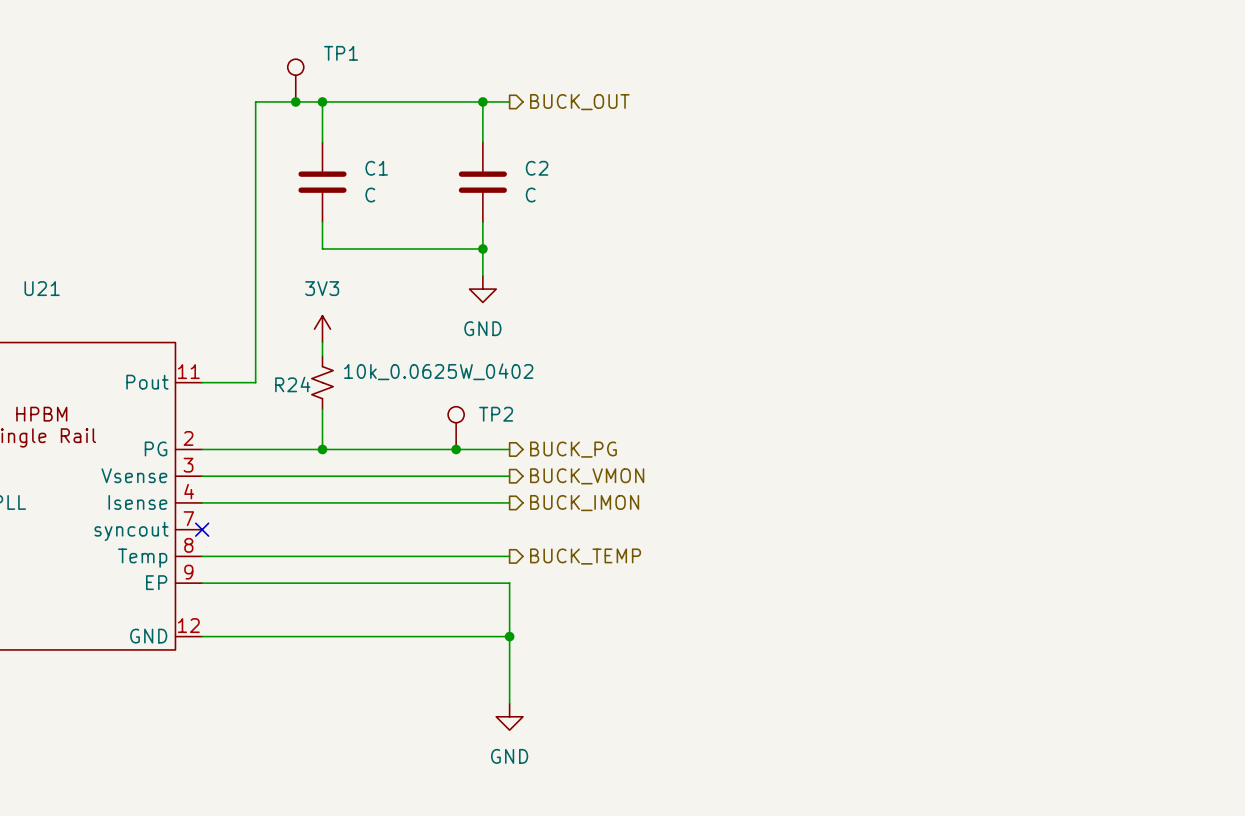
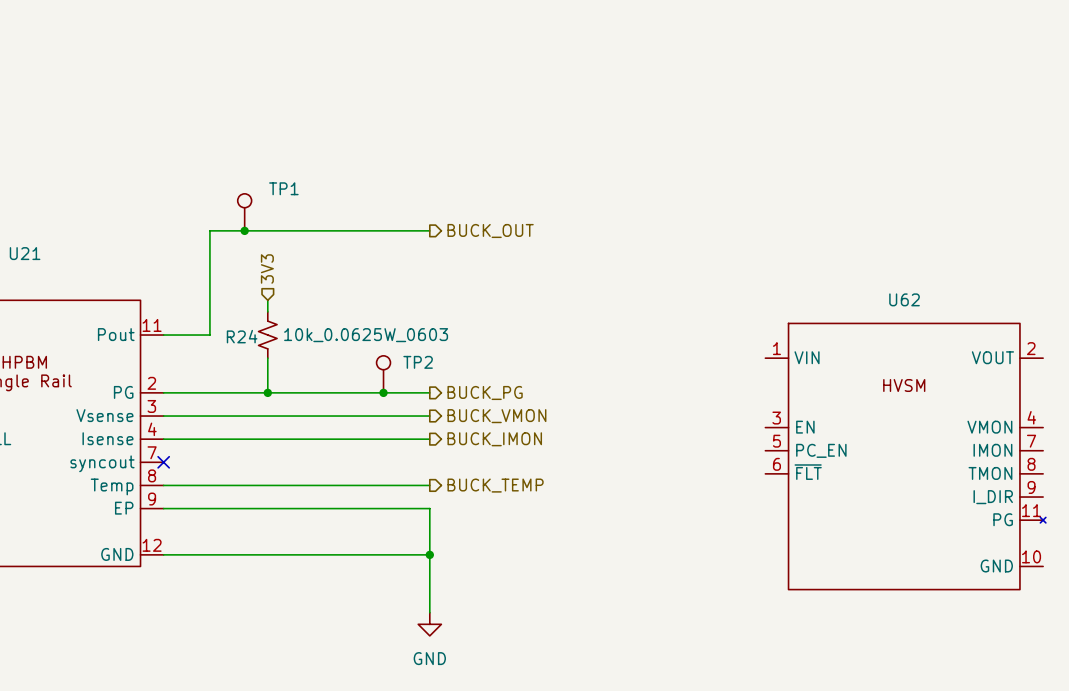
TP1 position: (295, 80) -> (244, 212)
junction: (295, 101) -> none
wire: (322, 101) (322, 142) -> none
junction: (322, 101) -> none
wire: (482, 101) (482, 142) -> none
junction: (482, 101) -> none
wire: (509, 101) (255, 101) (255, 262) -> (429, 230) (209, 230)
hierarchical label position: BUCK_OUT (579, 102) -> BUCK_OUT (490, 230)
C1: C (322, 182) -> none
C2: C (482, 182) -> none
wire: (322, 222) (322, 248) (482, 248) -> none
wire: (482, 222) (482, 275) -> none
junction: (482, 248) -> none
junction: none -> (244, 230)
power symbol: GND (482, 289) -> none
hierarchical label: none -> 3V3 (267, 268)
power symbol: 3V3 (322, 329) -> none
R24 value: 10k_0.0625W_0402 (438, 371) -> 10k_0.0625W_0603 (366, 335)
U62: none -> (905, 456)

